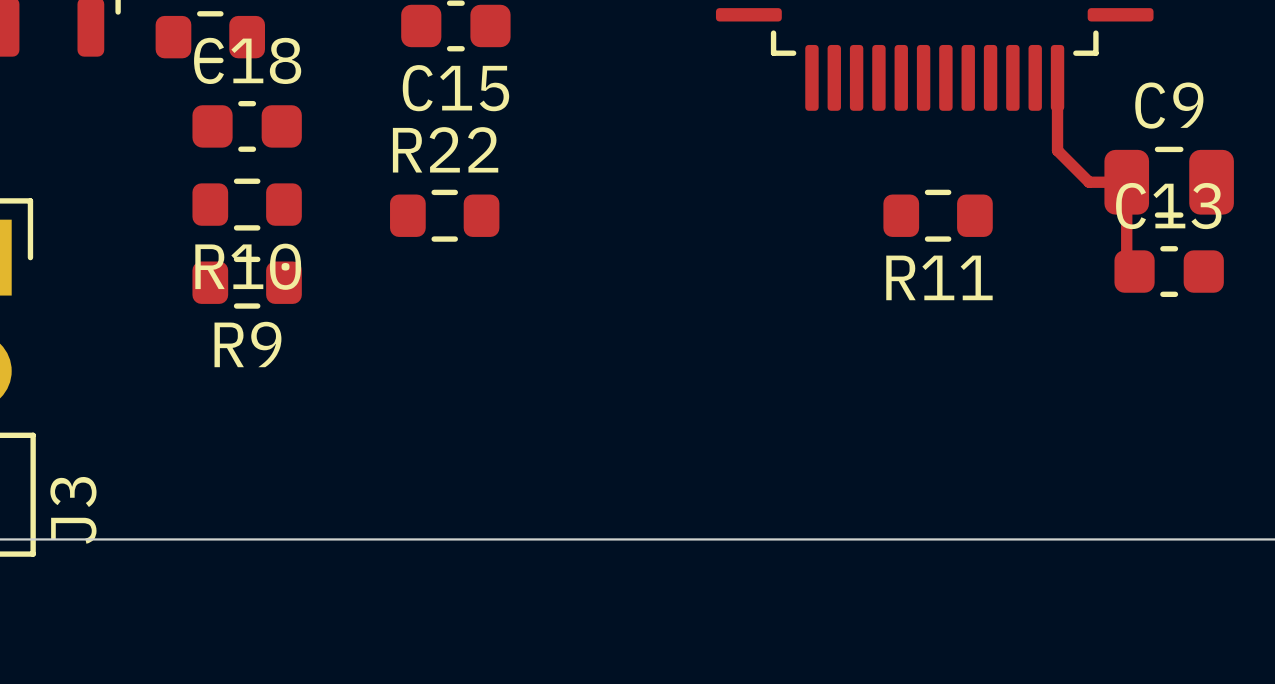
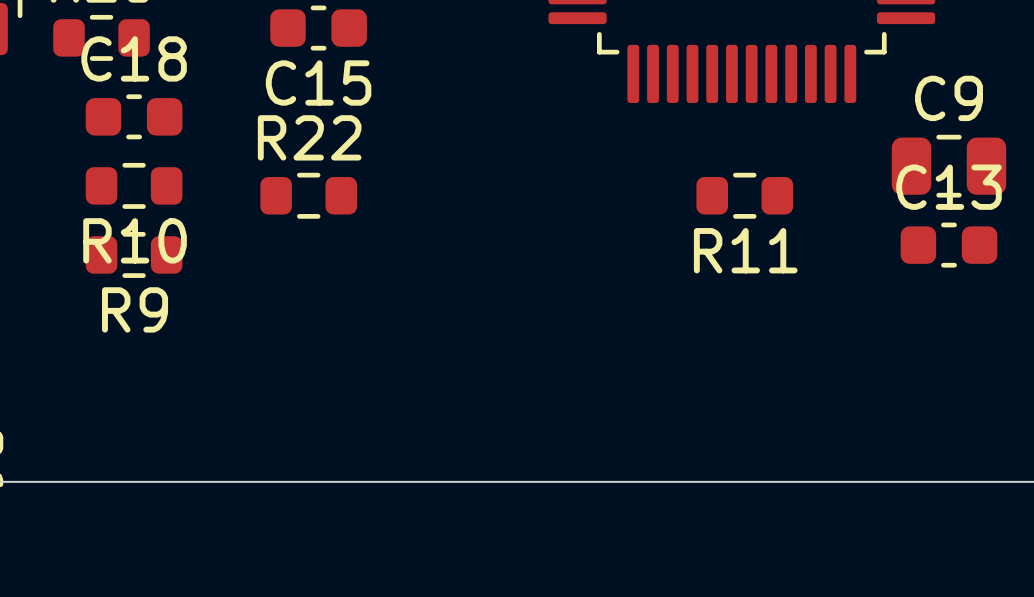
track: (1057, 77) (1057, 150) (1089, 182) (1126, 182) (1126, 263) (1134, 271) -> none

